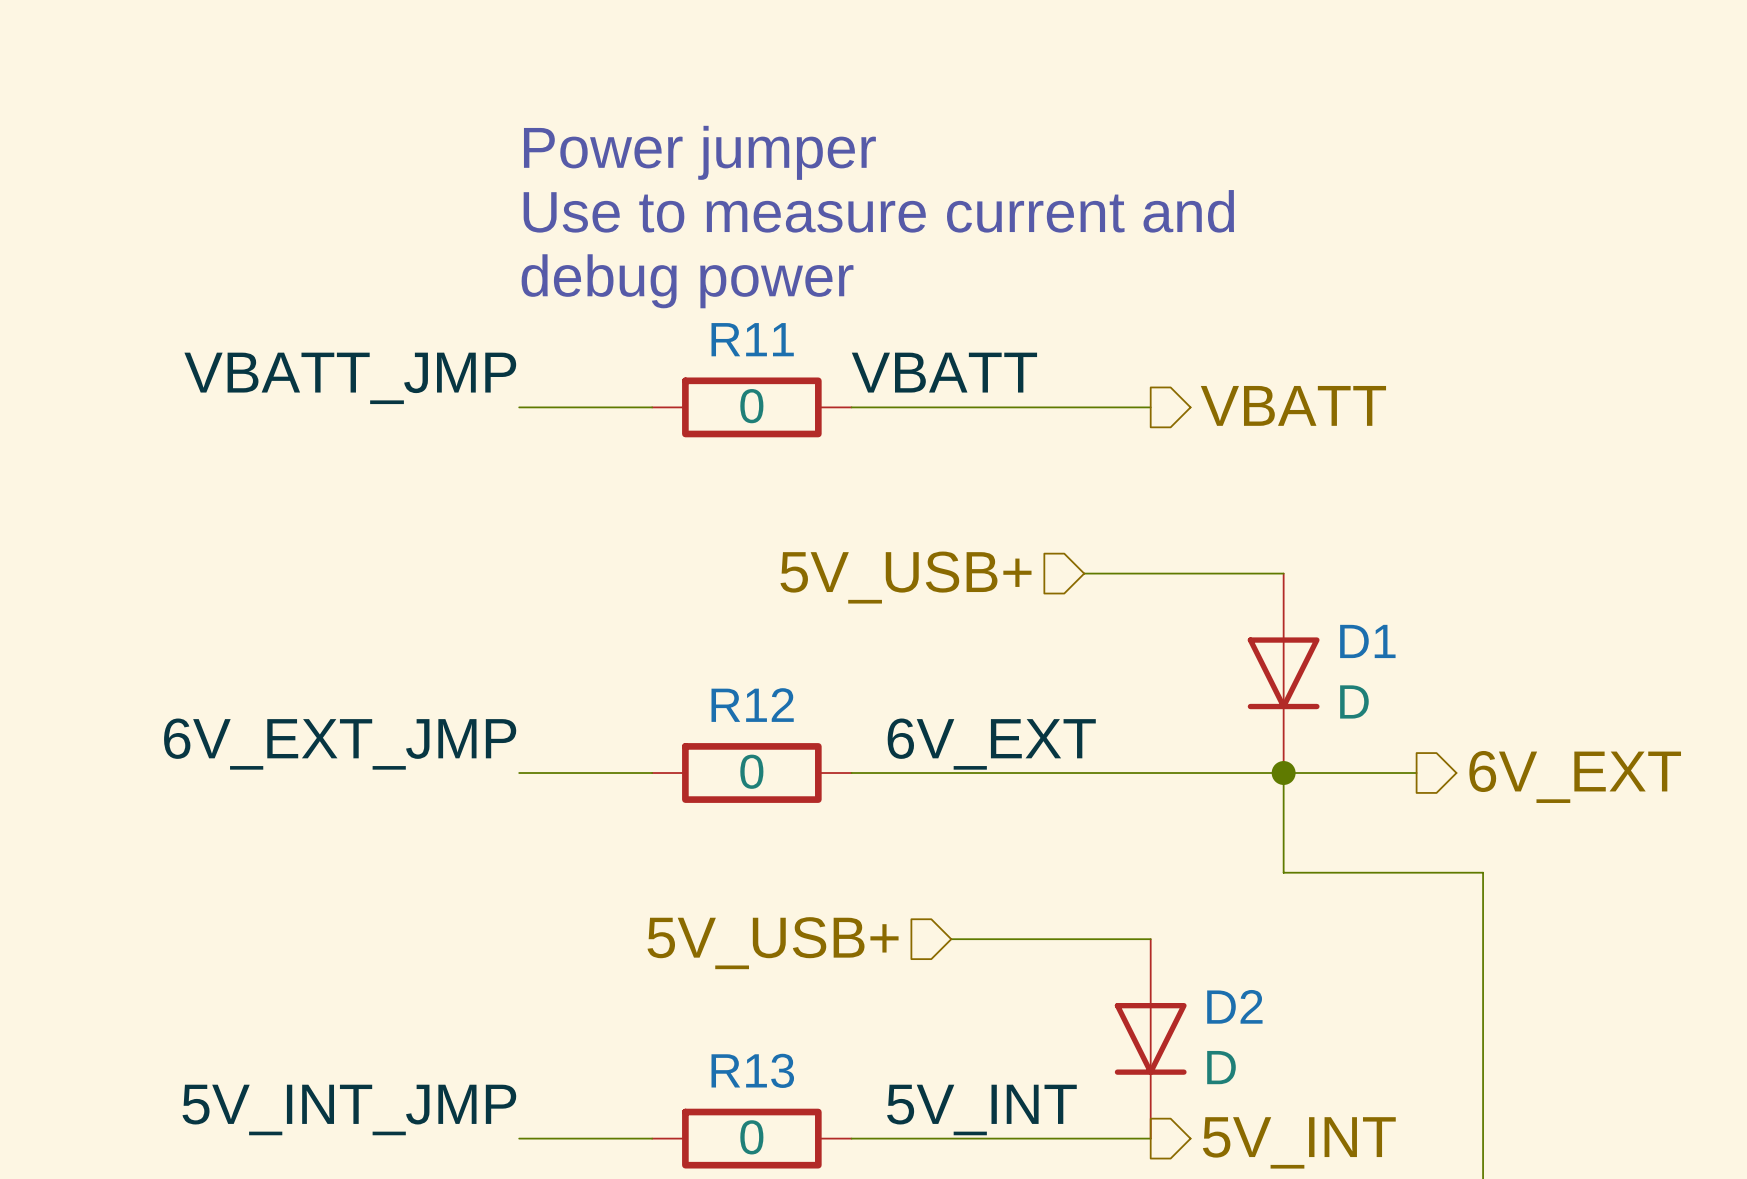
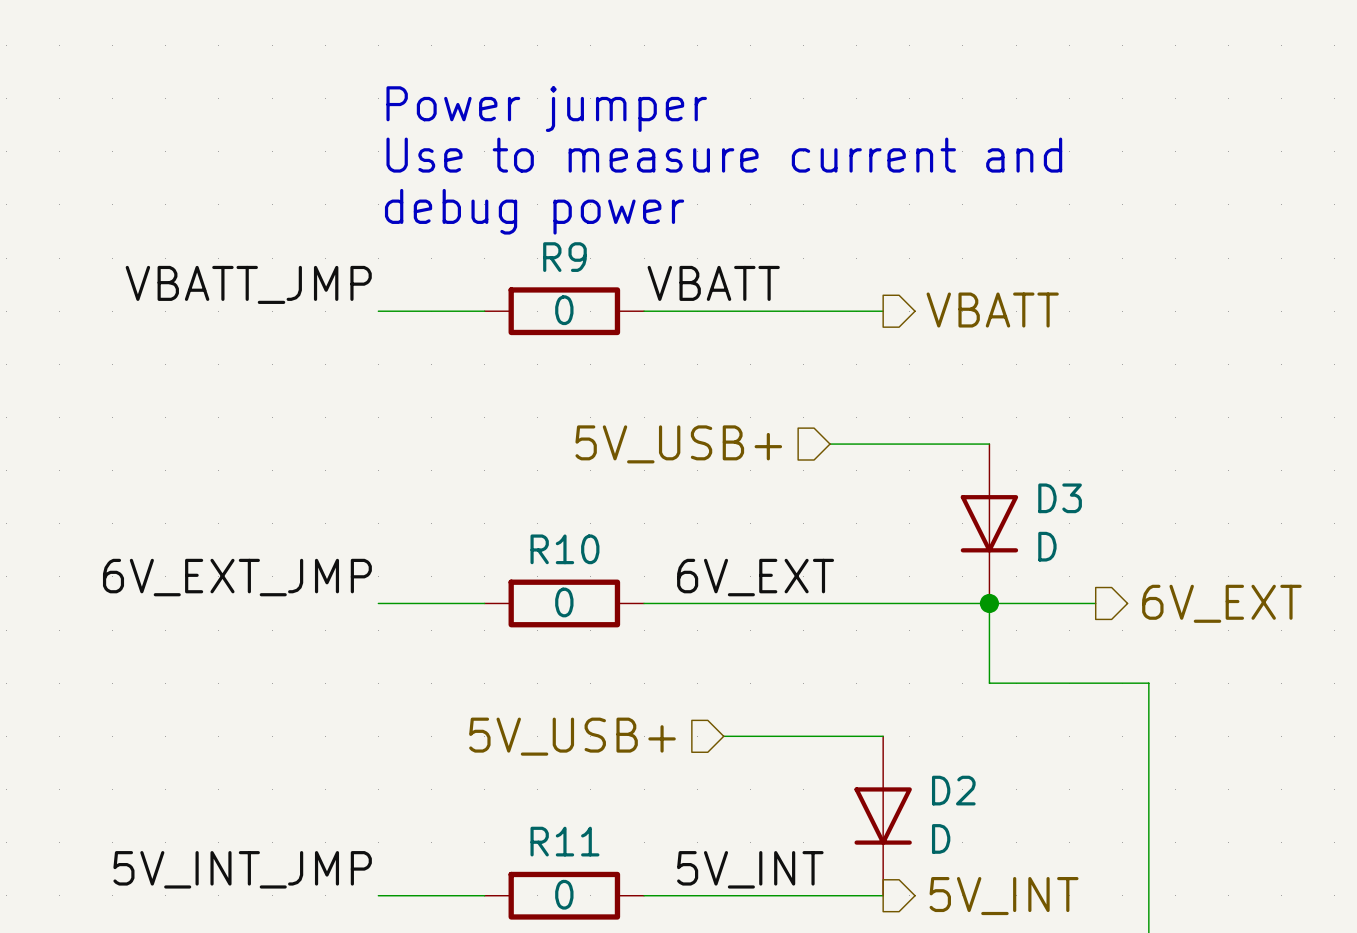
R11 name: R11 (752, 339) -> R9 (564, 257)
D1 name: D1 (1367, 641) -> D3 (1060, 498)
R12 name: R12 (752, 705) -> R10 (564, 549)
R13 name: R13 (752, 1070) -> R11 (564, 841)

